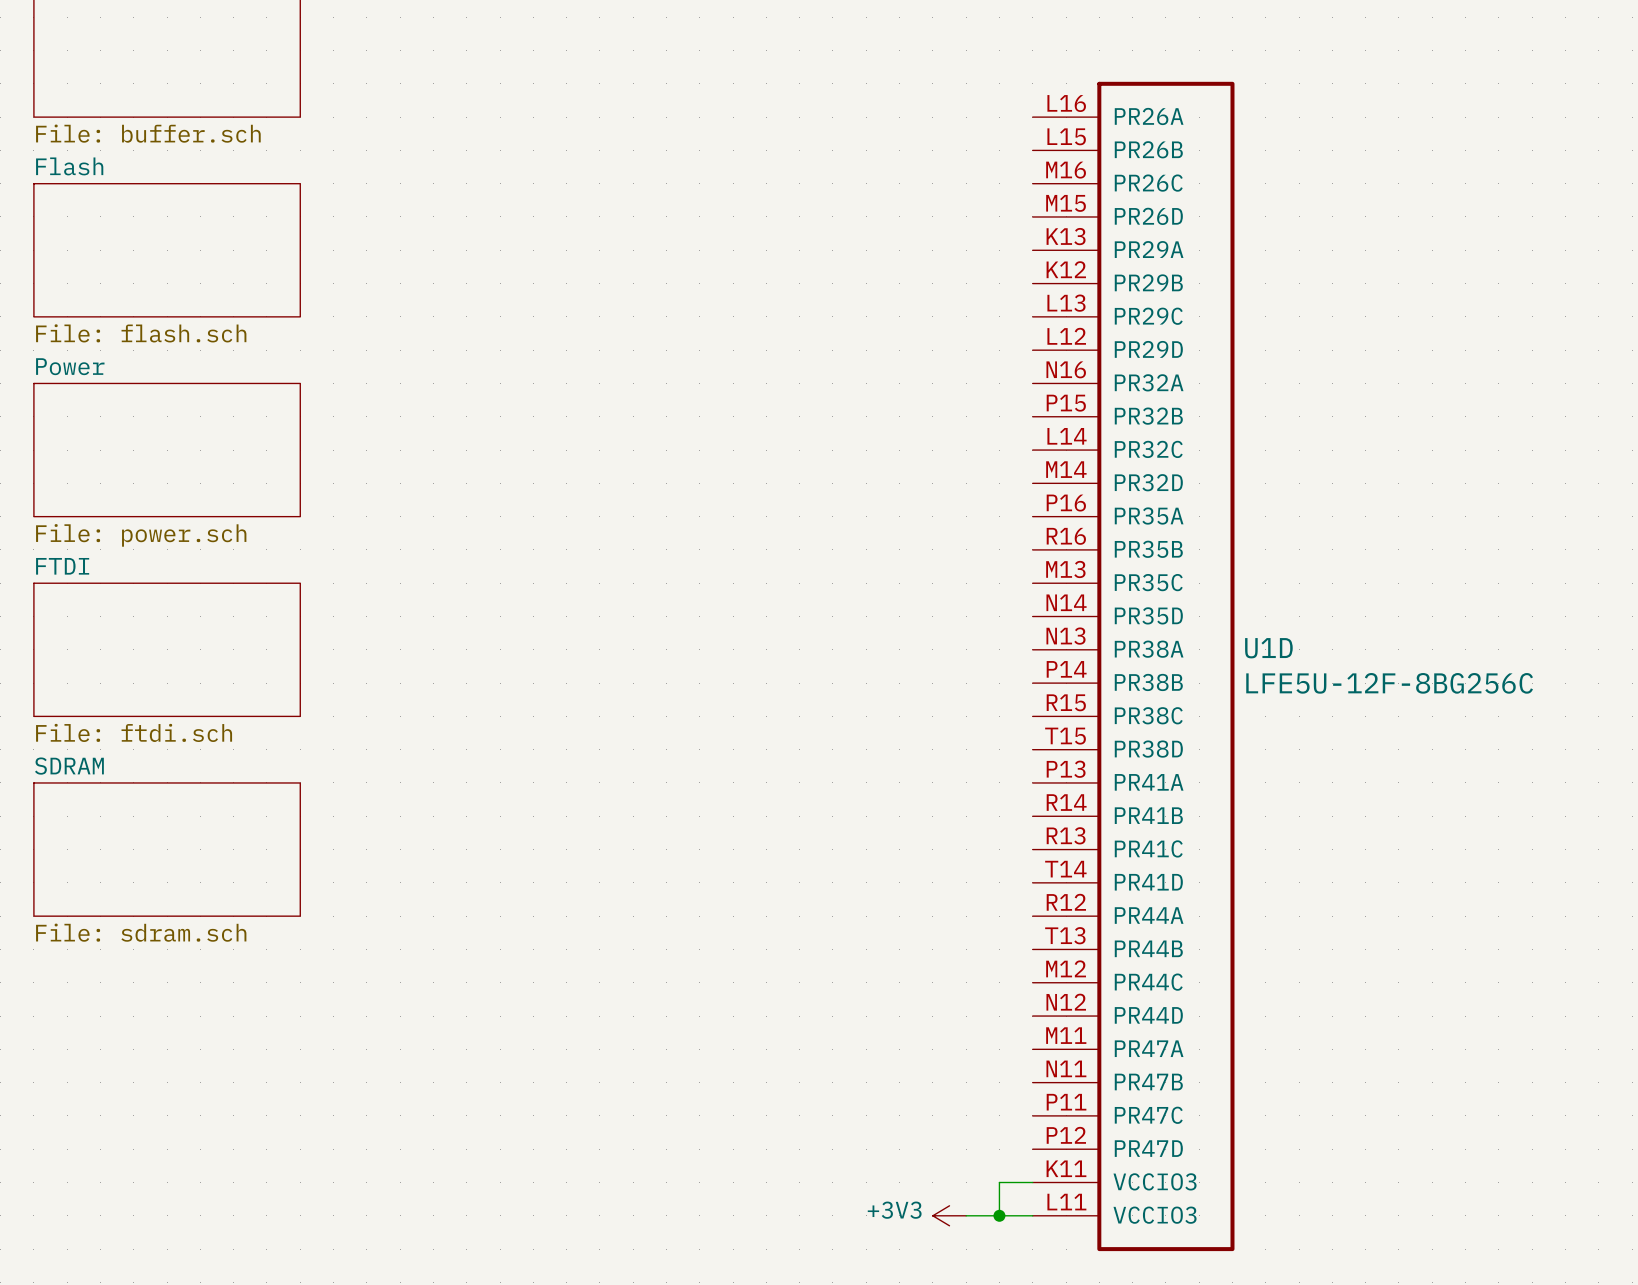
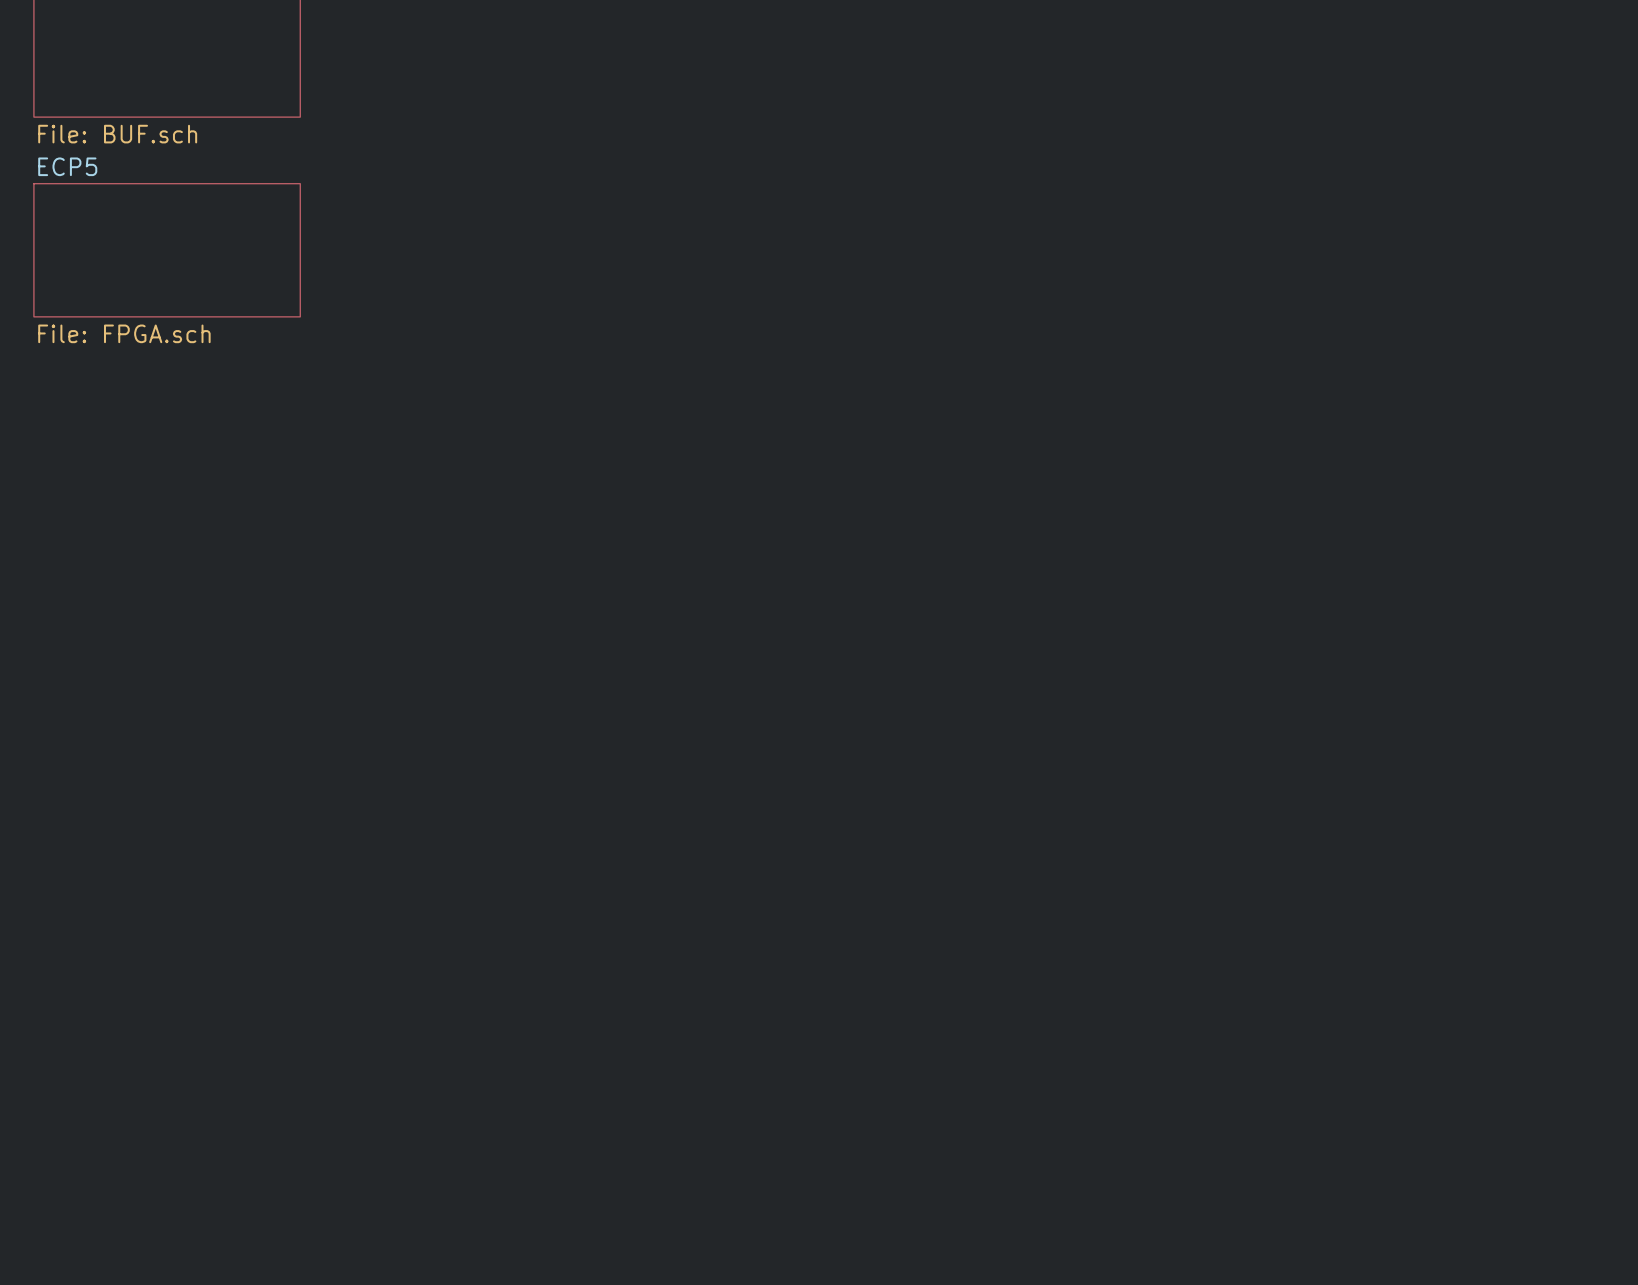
sheet value: File: buffer.sch (148, 133) -> File: BUF.sch (117, 134)
sheet Flash name: Flash (69, 166) -> ECP5 (67, 166)
sheet Flash value: File: flash.sch (141, 333) -> File: FPGA.sch (124, 333)
sheet Power: File: power.sch (167, 450) -> none
sheet FTDI: File: ftdi.sch (167, 649) -> none
U1D: LFE5U-12F-8BG256C (1133, 666) -> none
sheet SDRAM: File: sdram.sch (167, 849) -> none
wire: (1032, 1182) (999, 1182) (999, 1215) -> none
power symbol: +3V3 (949, 1215) -> none
wire: (966, 1215) (1032, 1215) -> none
junction: (999, 1215) -> none

